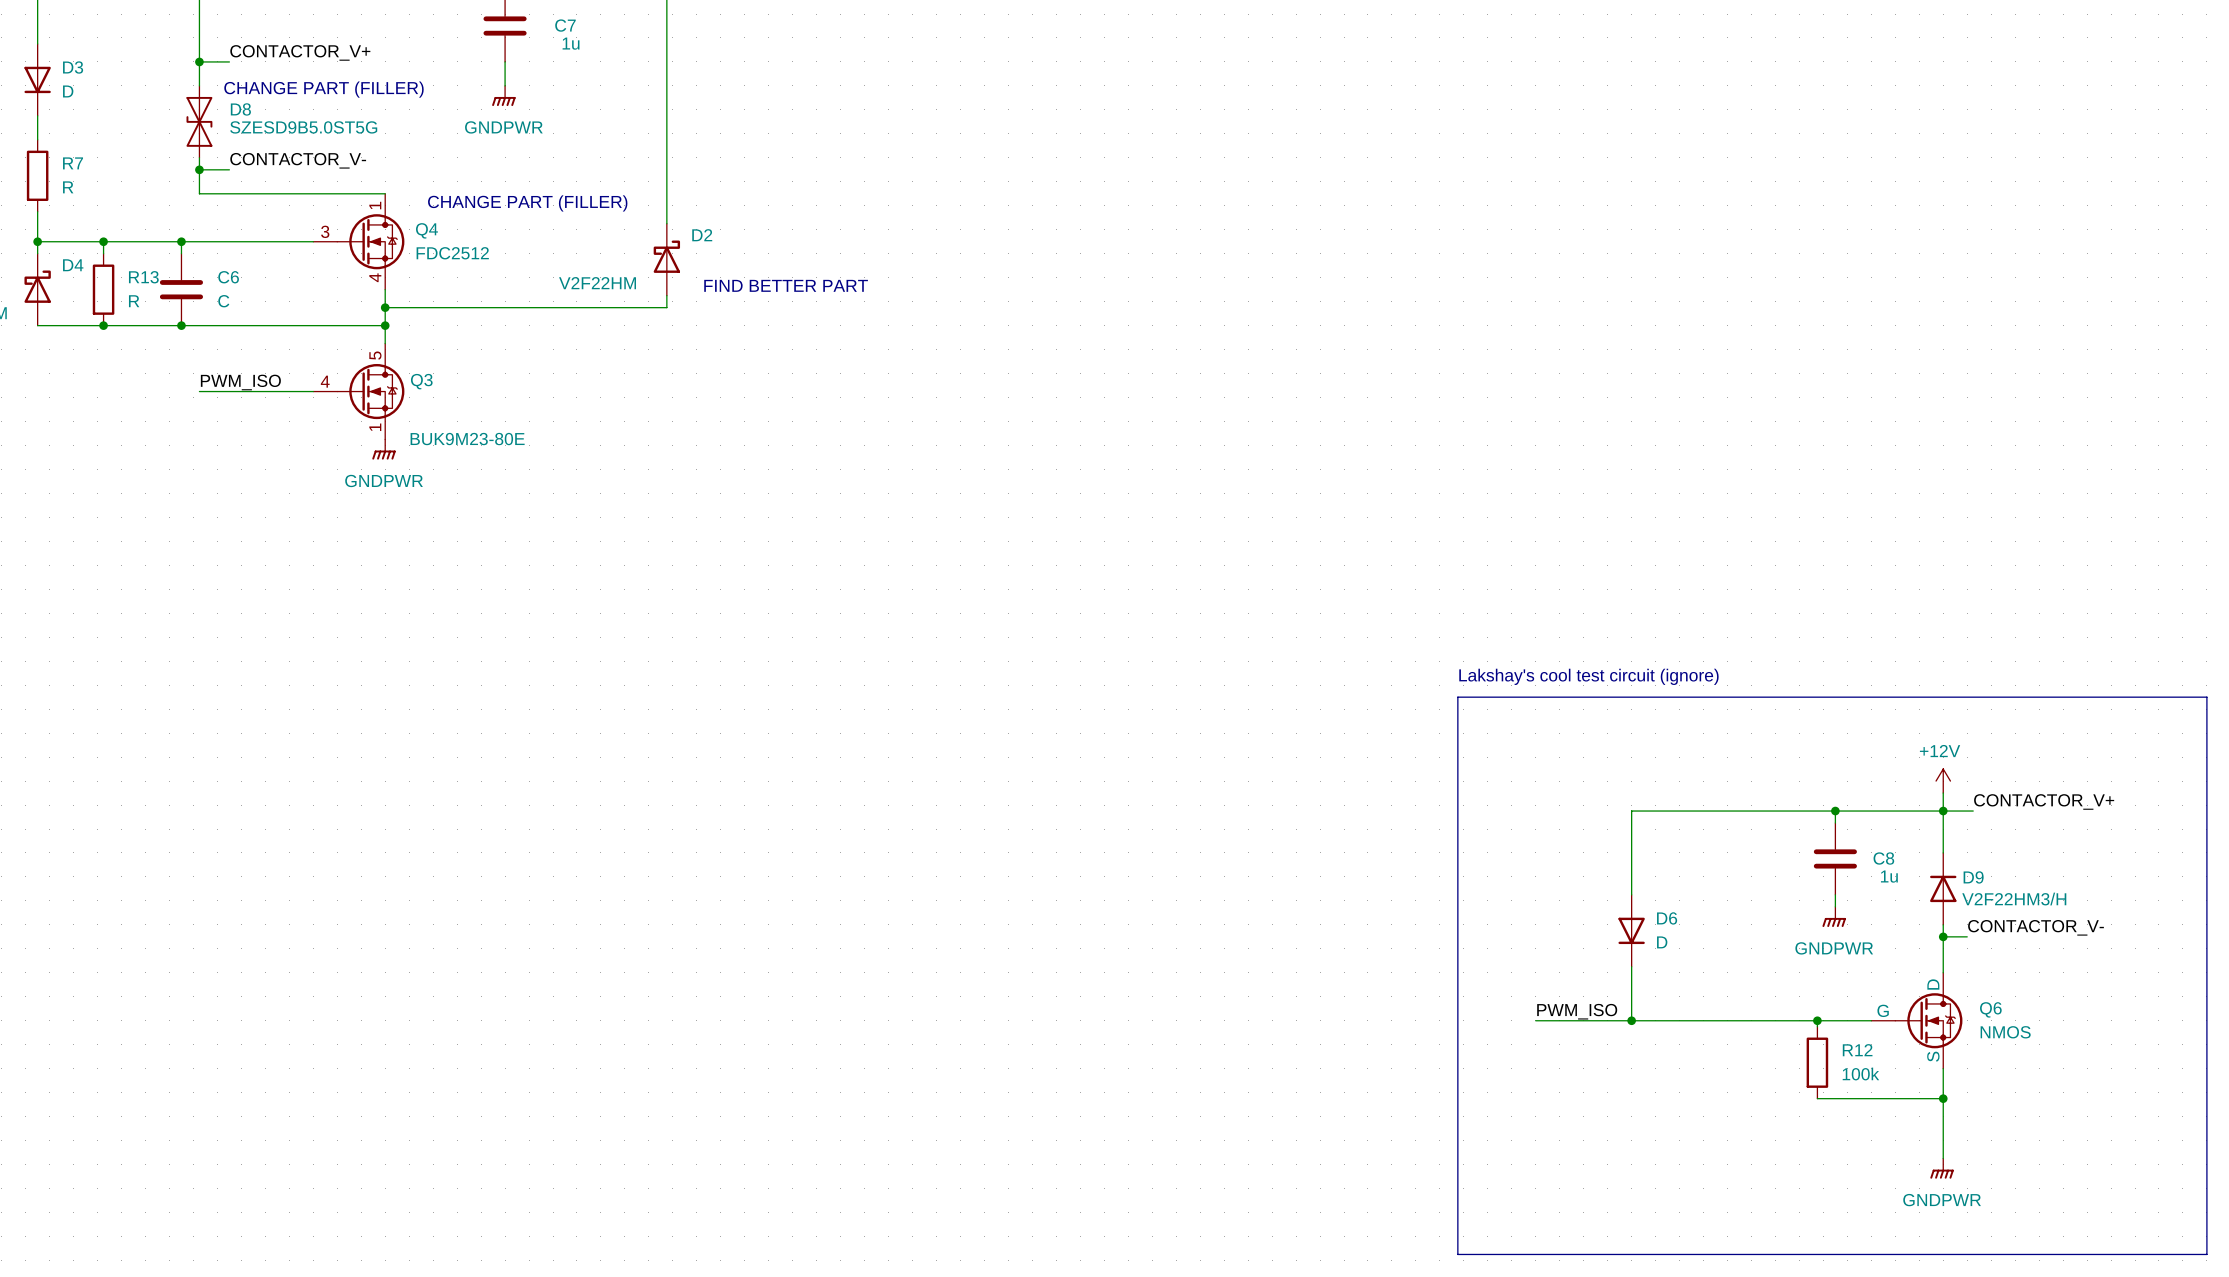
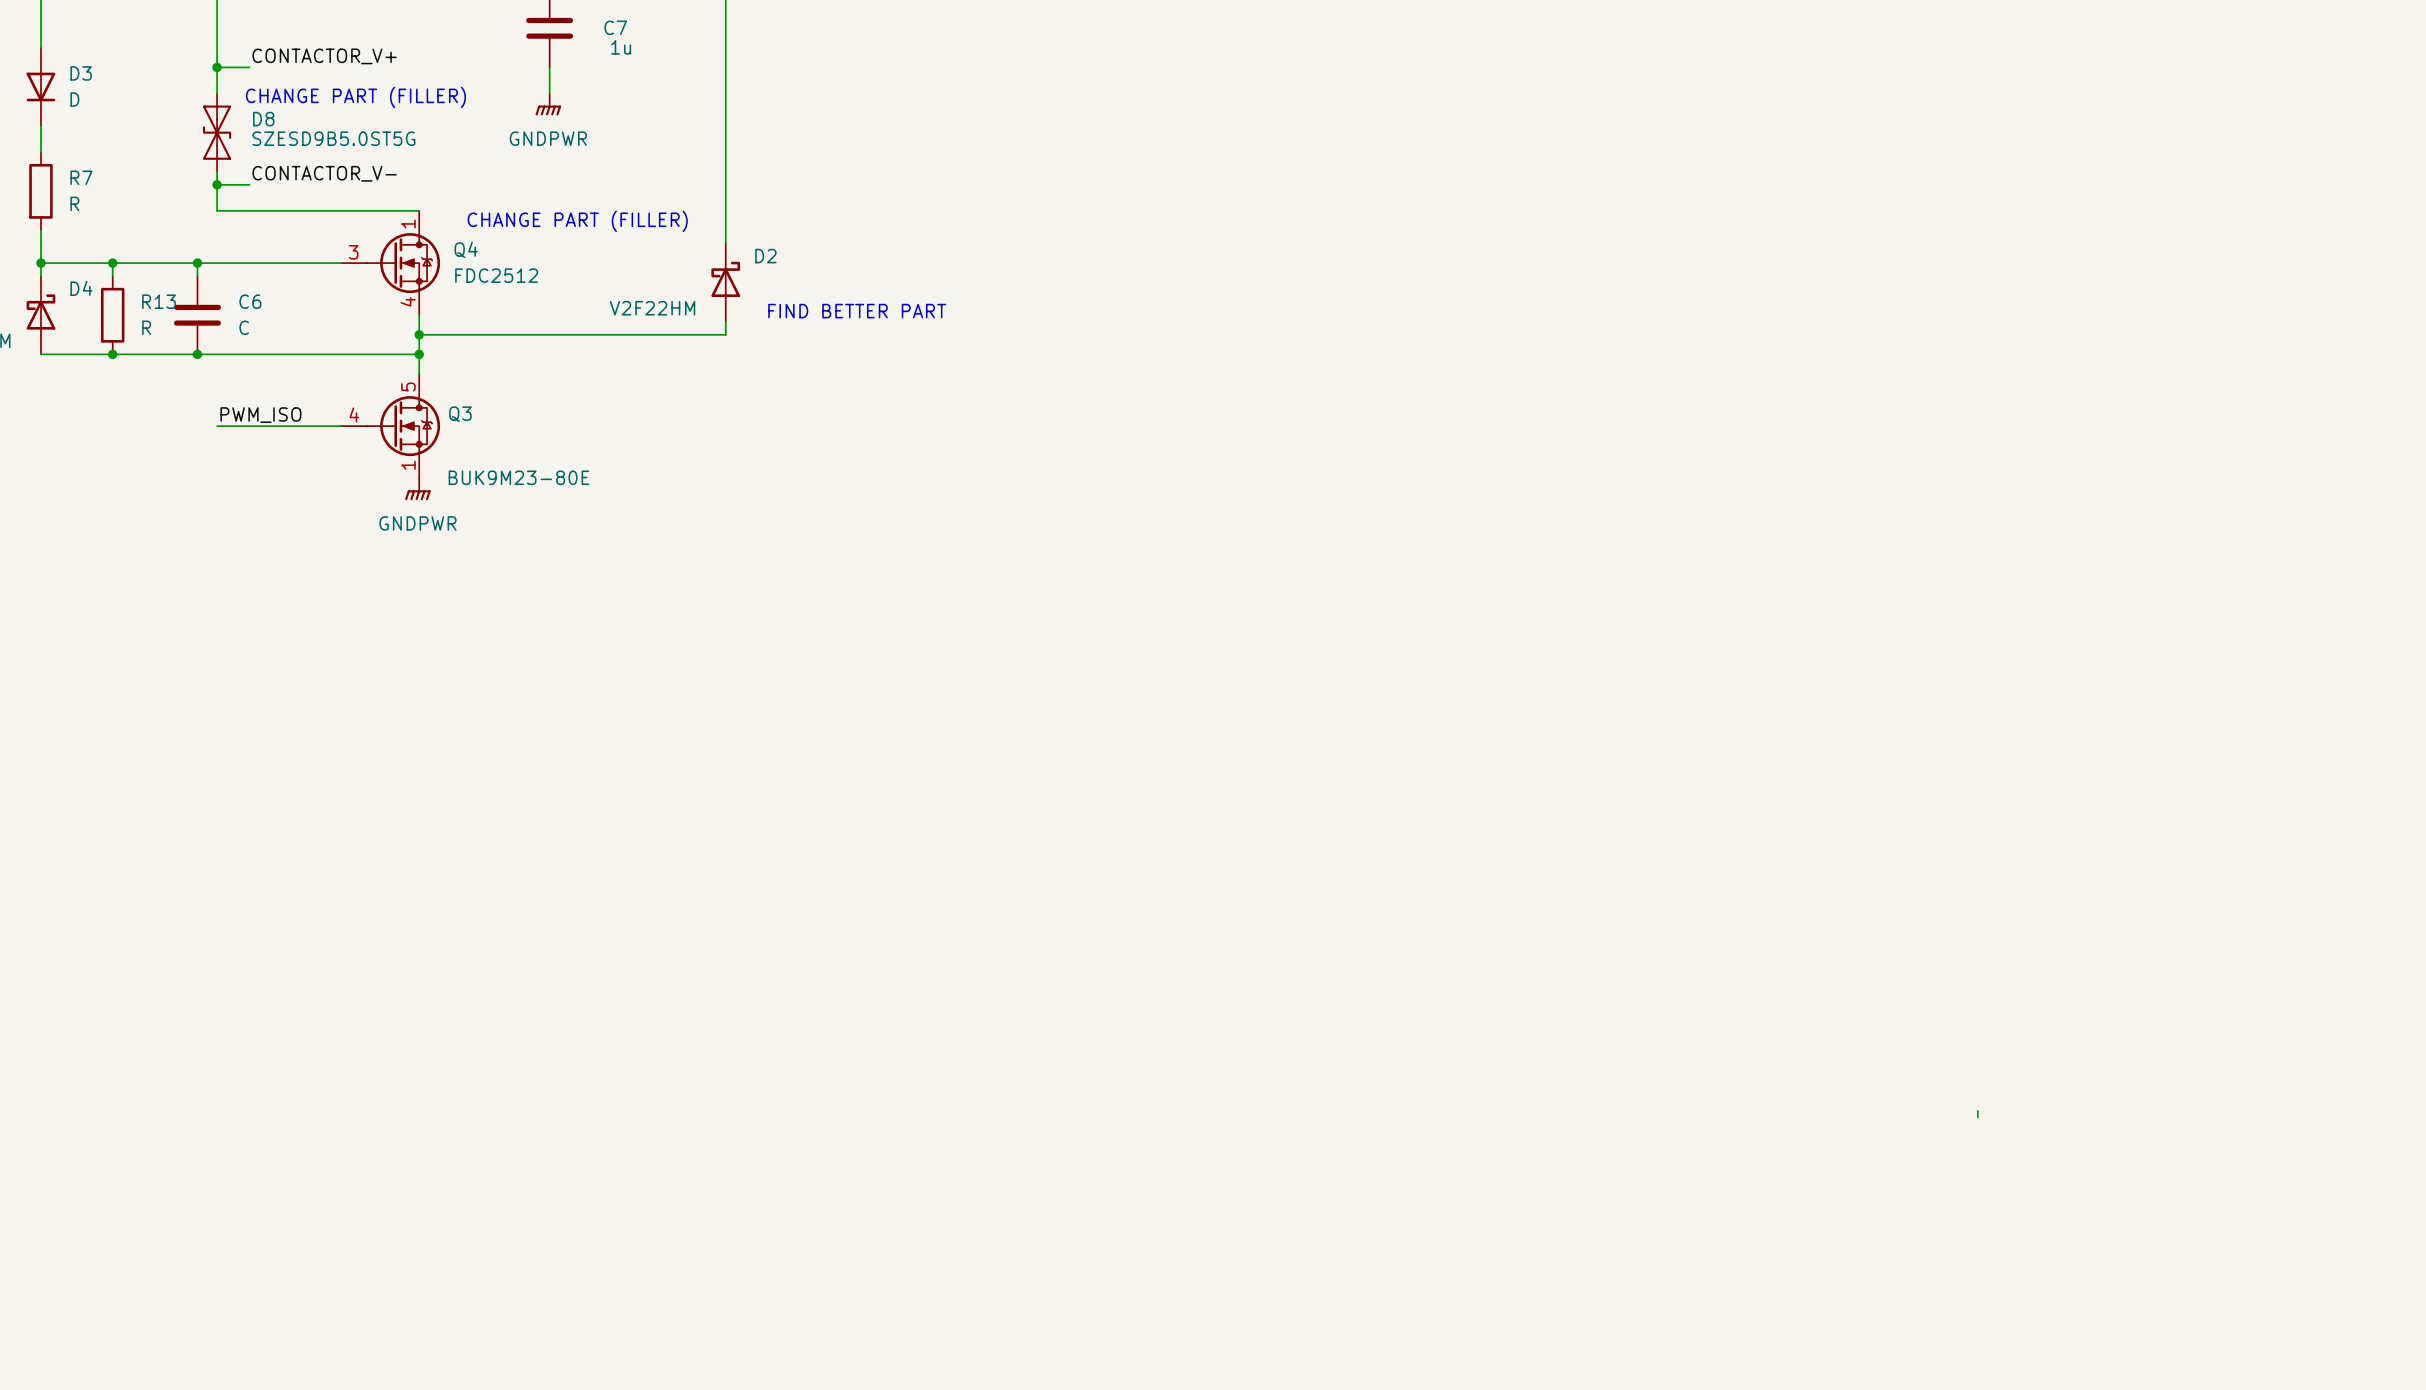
text: Lakshay's cool test circuit (ignore) (1588, 676) -> none
line: (1457, 697) (2206, 697) (2206, 1254) (1457, 1254) (1457, 697) -> none
power symbol: +12V (1943, 781) -> none
wire: (1943, 793) (1943, 852) -> none
label: CONTACTOR_V+ (2044, 801) -> none
wire: (1835, 811) (1835, 823) -> none
junction: (1835, 811) -> none
junction: (1943, 811) -> none
wire: (1973, 811) (1631, 811) (1631, 894) -> none
C8: 1u (1835, 858) -> none
D9: V2F22HM3/H (1943, 888) -> none
wire: (1835, 894) (1835, 906) -> none
power symbol: GNDPWR (1834, 916) -> none
wire: (1943, 924) (1943, 972) -> none
label: CONTACTOR_V- (2035, 927) -> none
D6: D (1631, 930) -> none
wire: (1943, 936) (1967, 936) -> none
junction: (1943, 936) -> none
wire: (1631, 966) (1631, 1020) -> none
label: PWM_ISO (1577, 1011) -> none
wire: (1535, 1020) (1871, 1020) -> none
junction: (1631, 1020) -> none
junction: (1817, 1020) -> none
Q6: NMOS (1916, 1020) -> none
R12: 100k (1817, 1062) -> none
wire: (1943, 1068) (1943, 1158) -> none
wire: (1817, 1098) (1943, 1098) -> none
junction: (1943, 1098) -> none
power symbol: GNDPWR (1942, 1168) -> none

